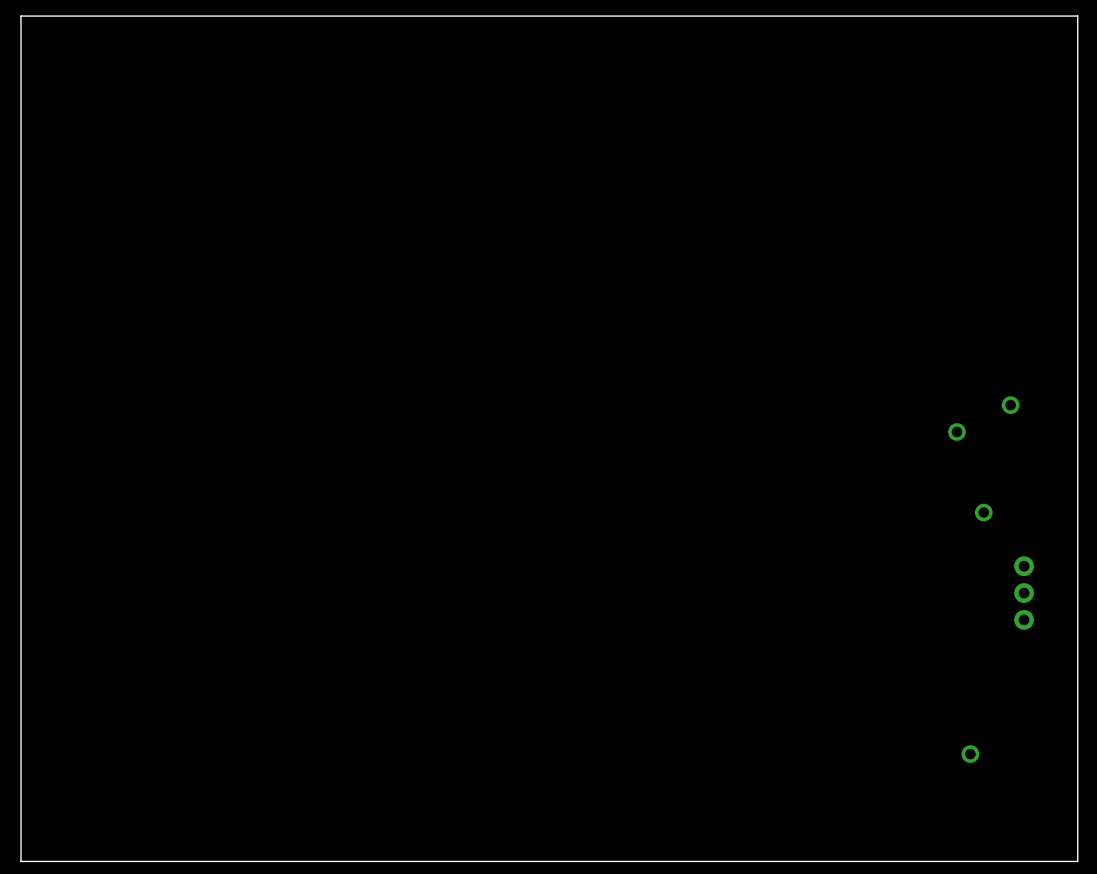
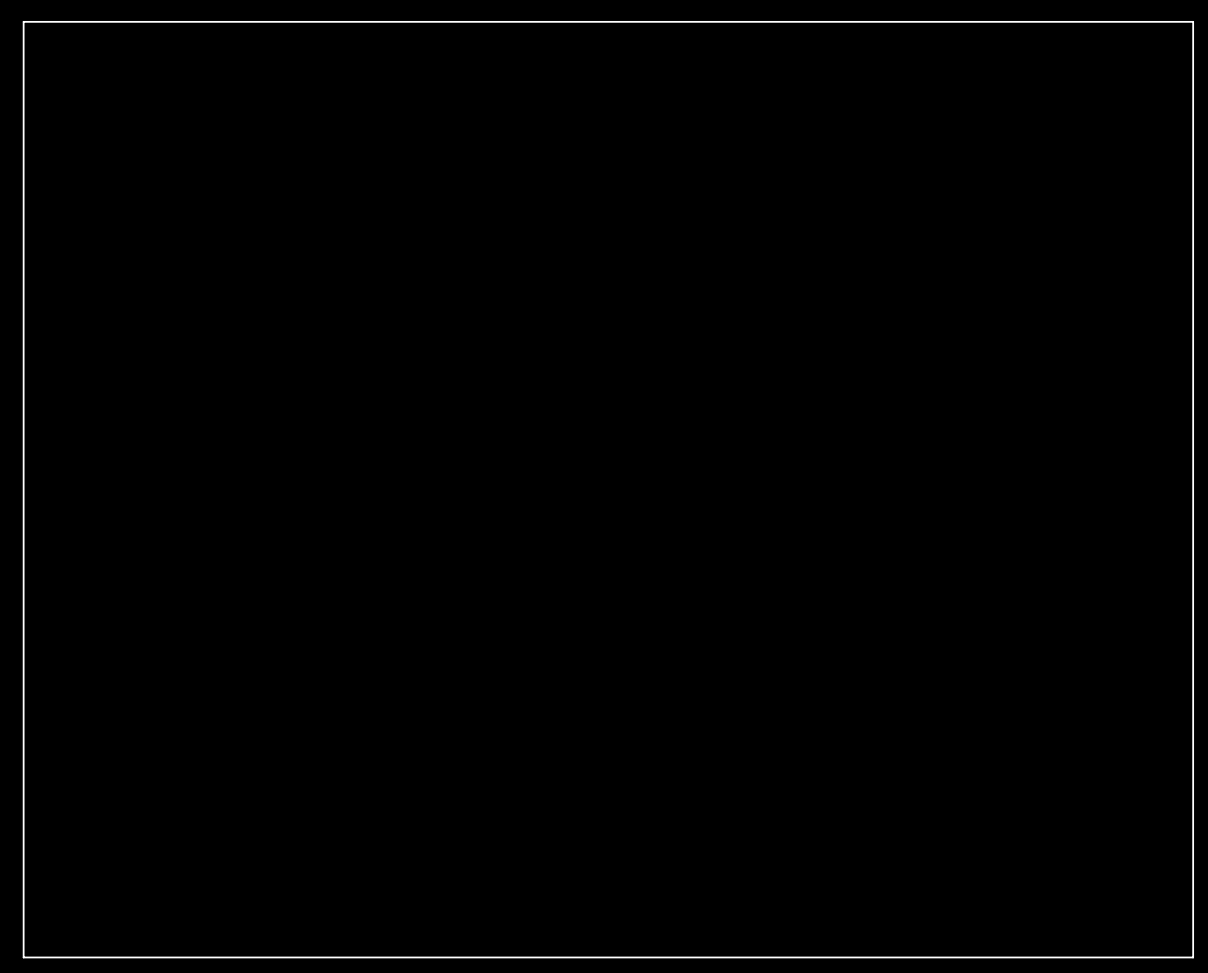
part: (1010, 405) -> none
part: (956, 431) -> none
part: (983, 512) -> none
part: (1024, 593) -> none
part: (970, 754) -> none

